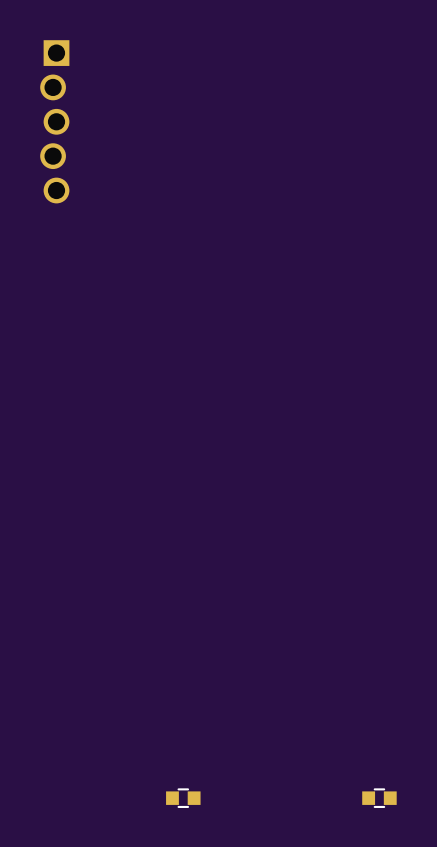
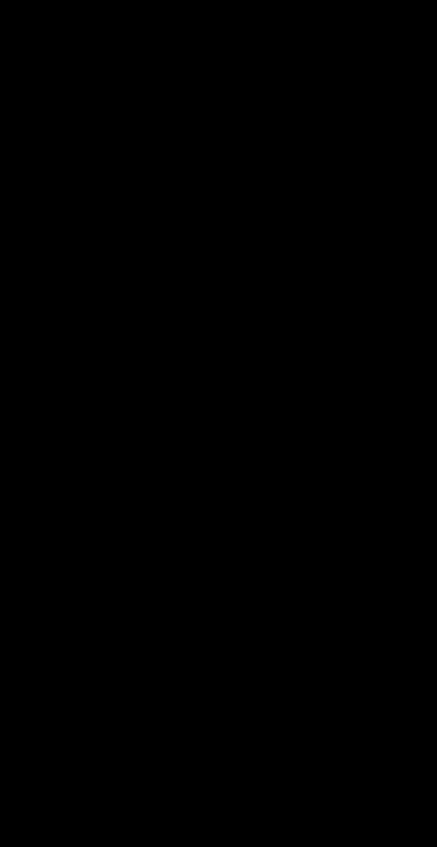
part: (54, 121) -> none
part: (183, 798) -> none
part: (379, 798) -> none

